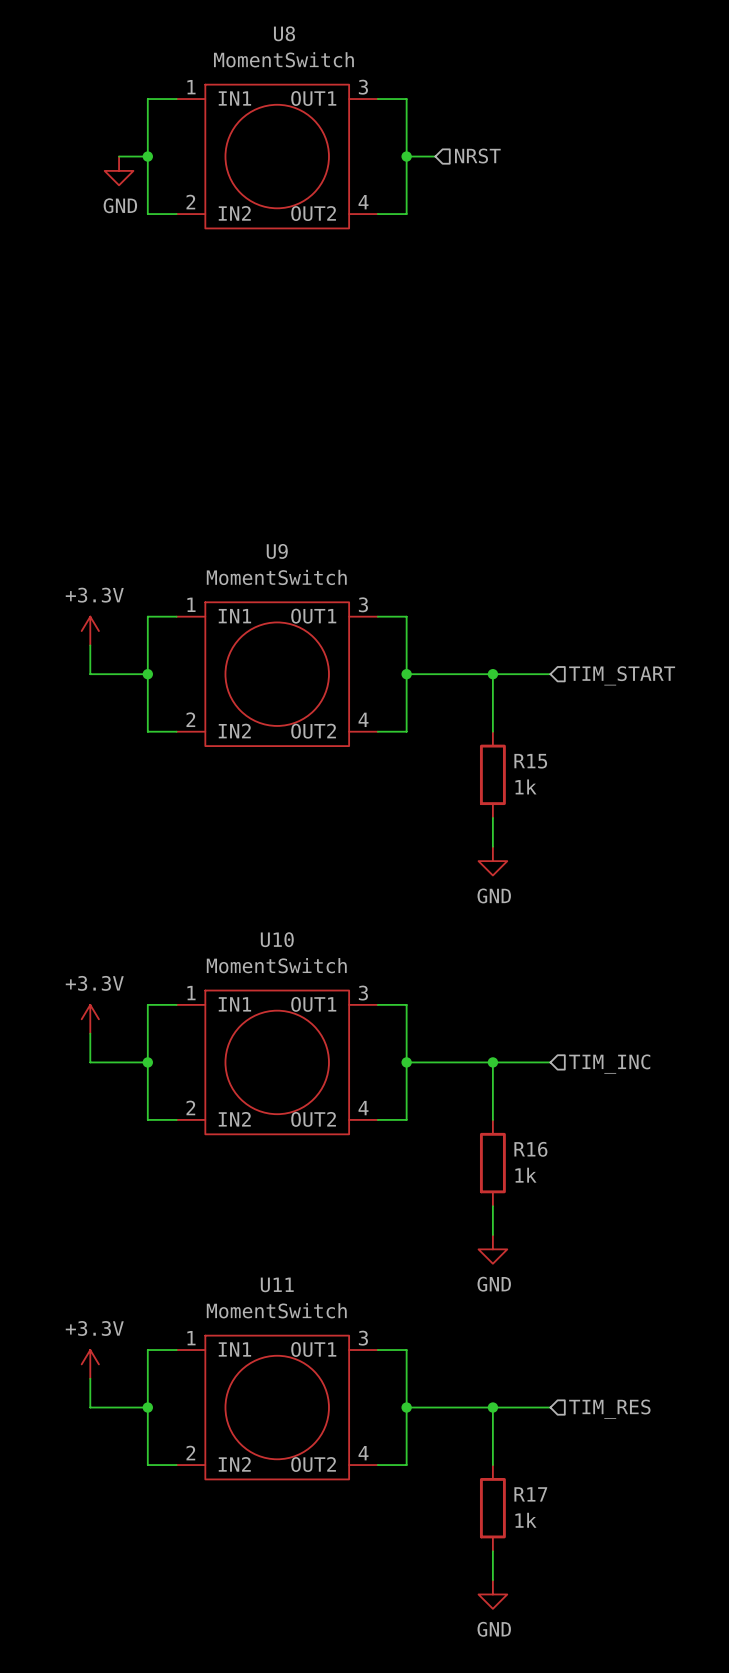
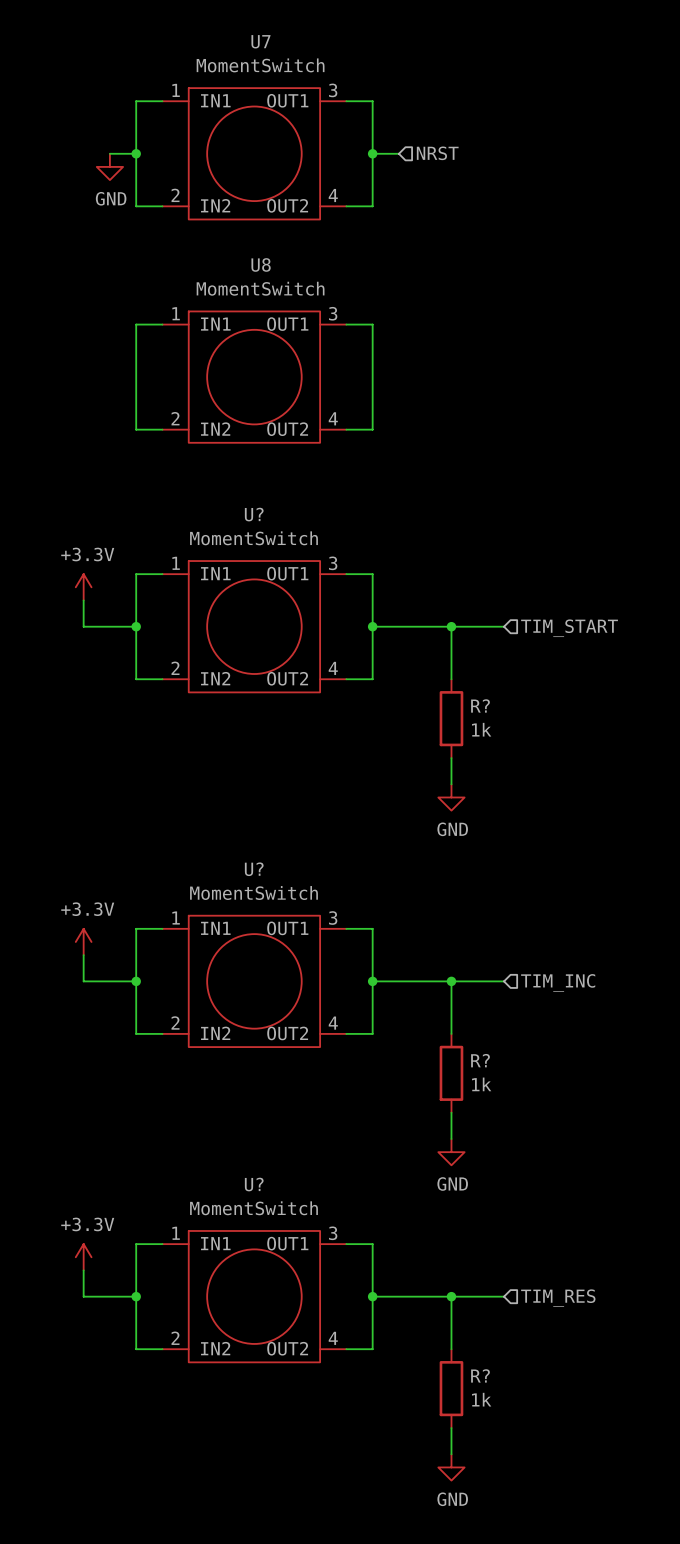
U8 name: U8 (284, 33) -> U7 (260, 41)
wire: none -> (162, 324) (136, 324) (136, 429) (162, 429)
wire: none -> (346, 324) (372, 324) (372, 429) (346, 429)
U8: none -> MomentSwitch (254, 377)
U9 name: U9 (277, 551) -> U? (254, 514)
R15 name: R15 (530, 761) -> R? (480, 705)
U10 name: U10 (277, 939) -> U? (254, 869)
R16 name: R16 (530, 1149) -> R? (480, 1060)
U11 name: U11 (277, 1284) -> U? (254, 1184)
R17 name: R17 (530, 1494) -> R? (480, 1375)

